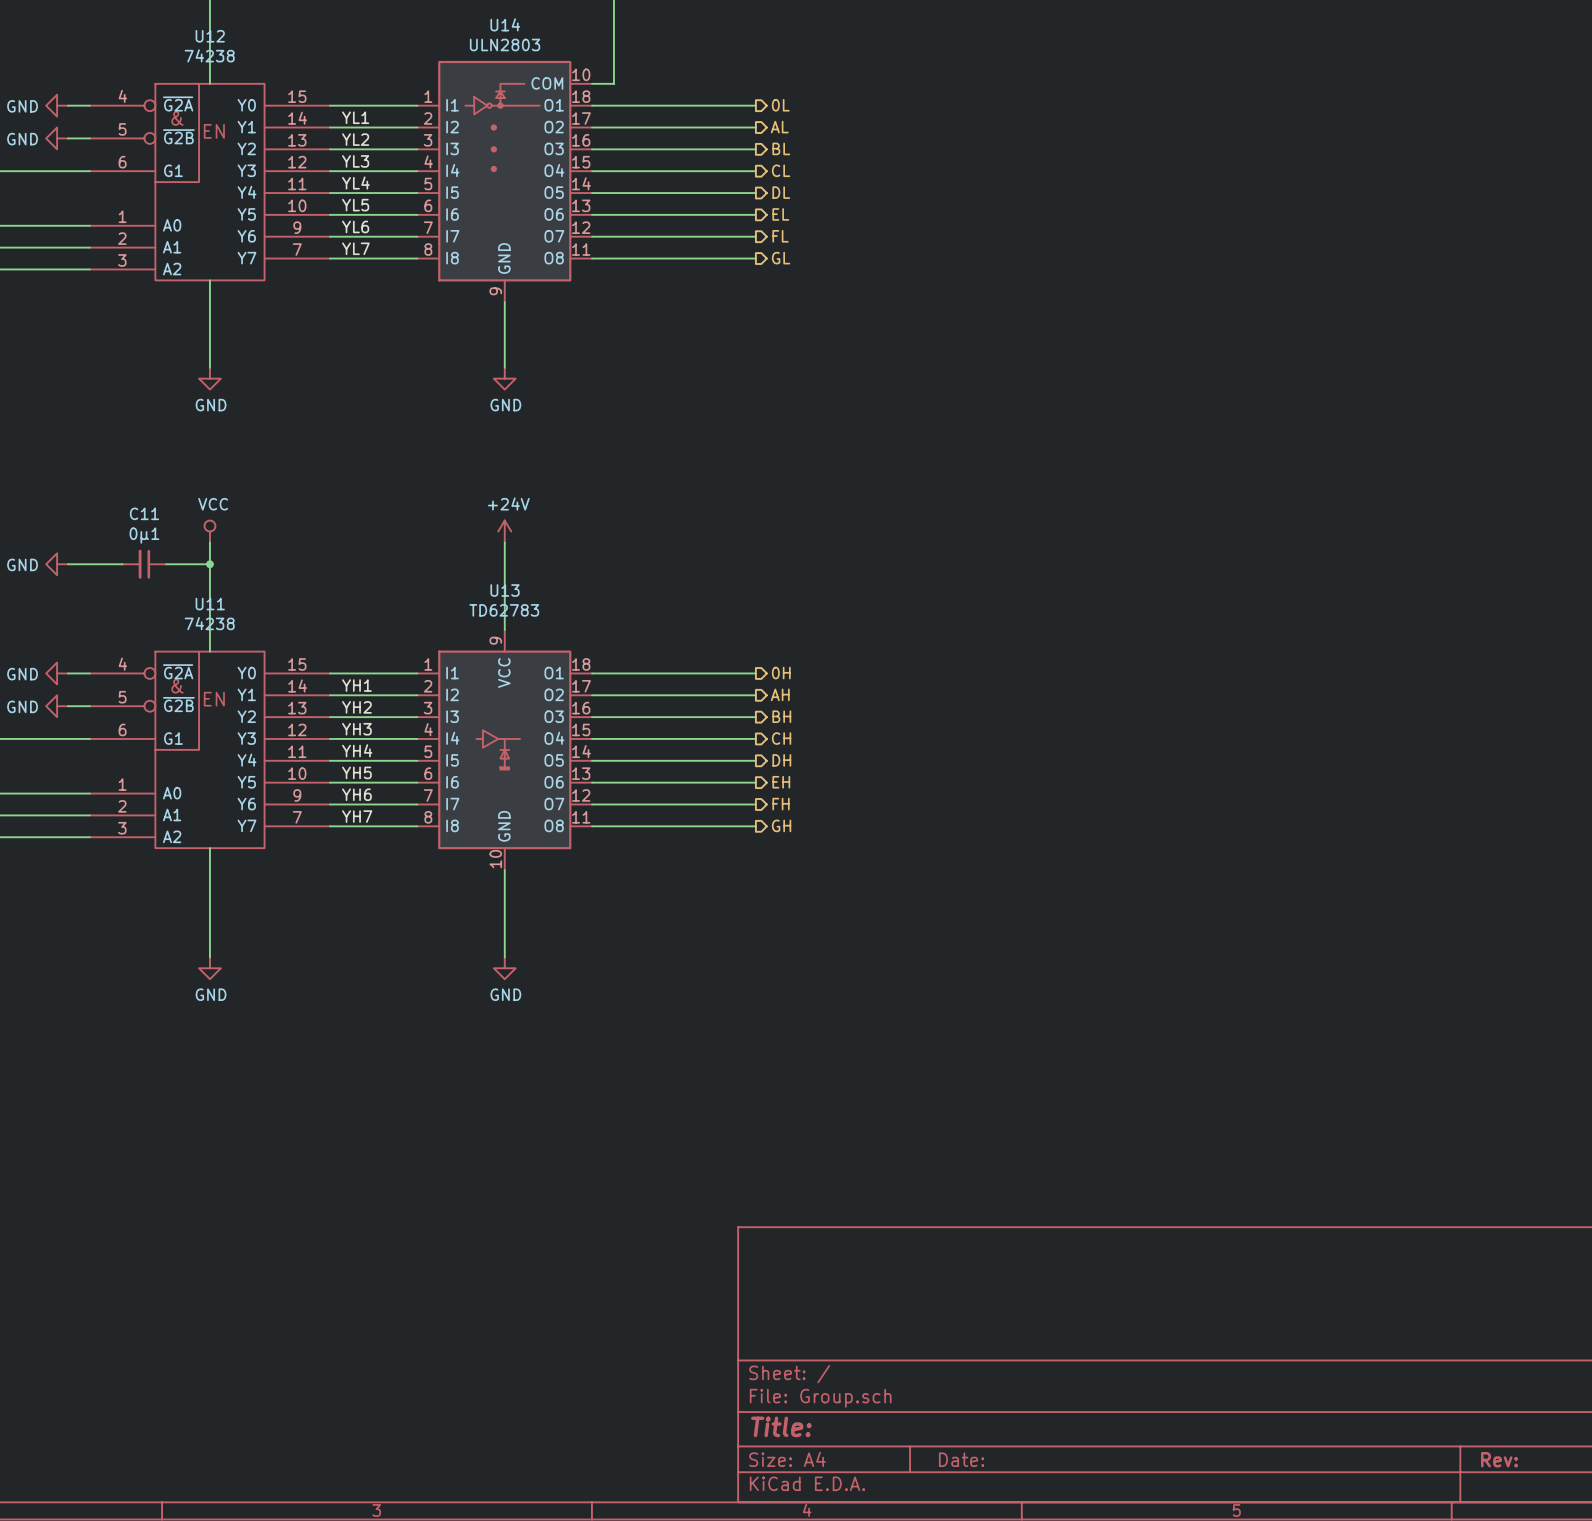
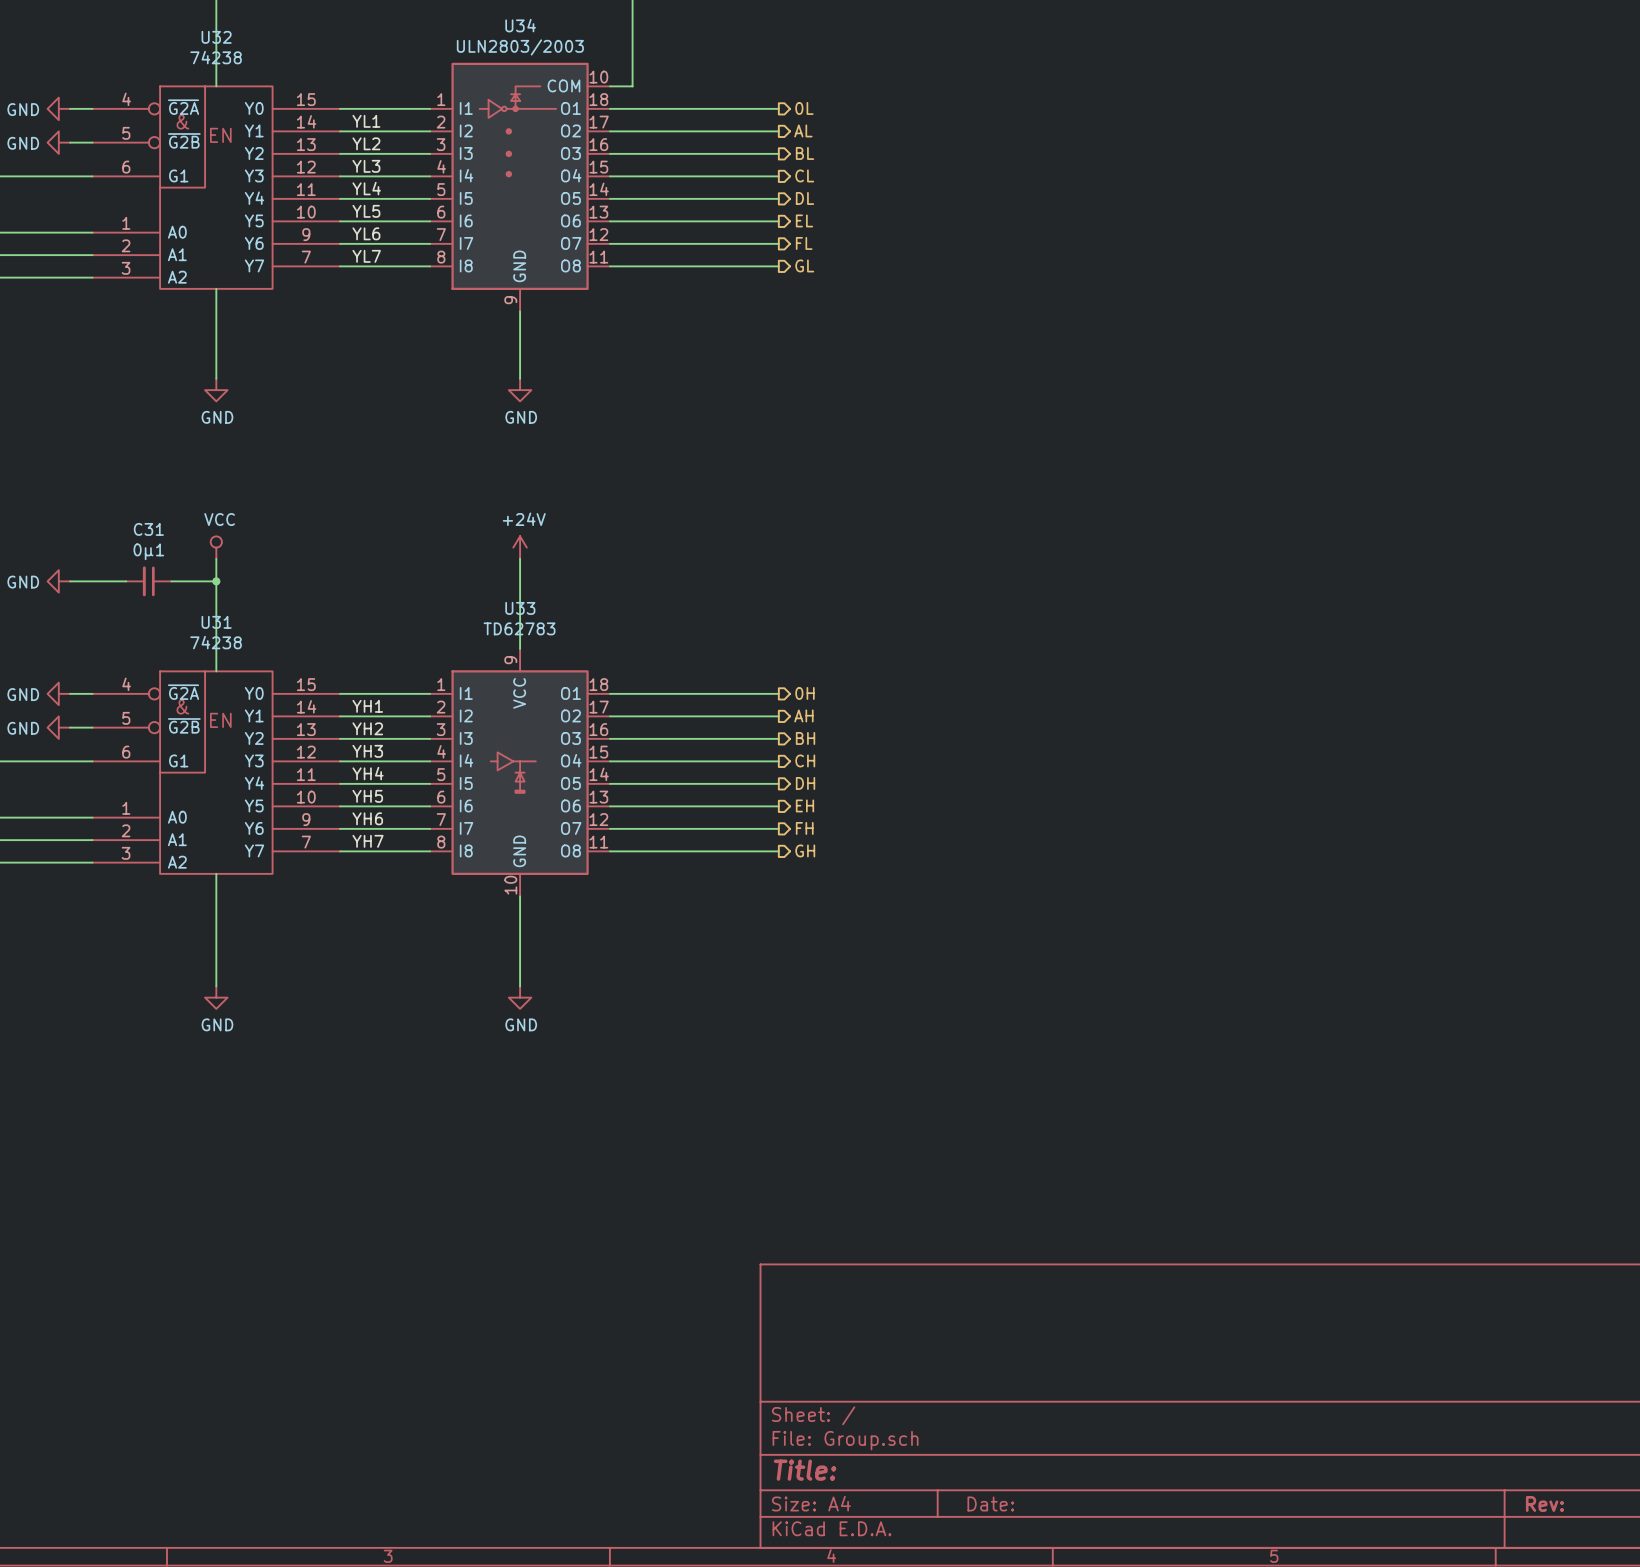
U14 name: U14 (505, 24) -> U34 (520, 25)
U12 name: U12 (210, 36) -> U32 (216, 37)
U14 value: ULN2803 (505, 44) -> ULN2803/2003 (520, 47)
C11 name: C11 (144, 513) -> C31 (148, 529)
U13 name: U13 (505, 590) -> U33 (520, 608)
U11 name: U11 (210, 604) -> U31 (216, 622)

